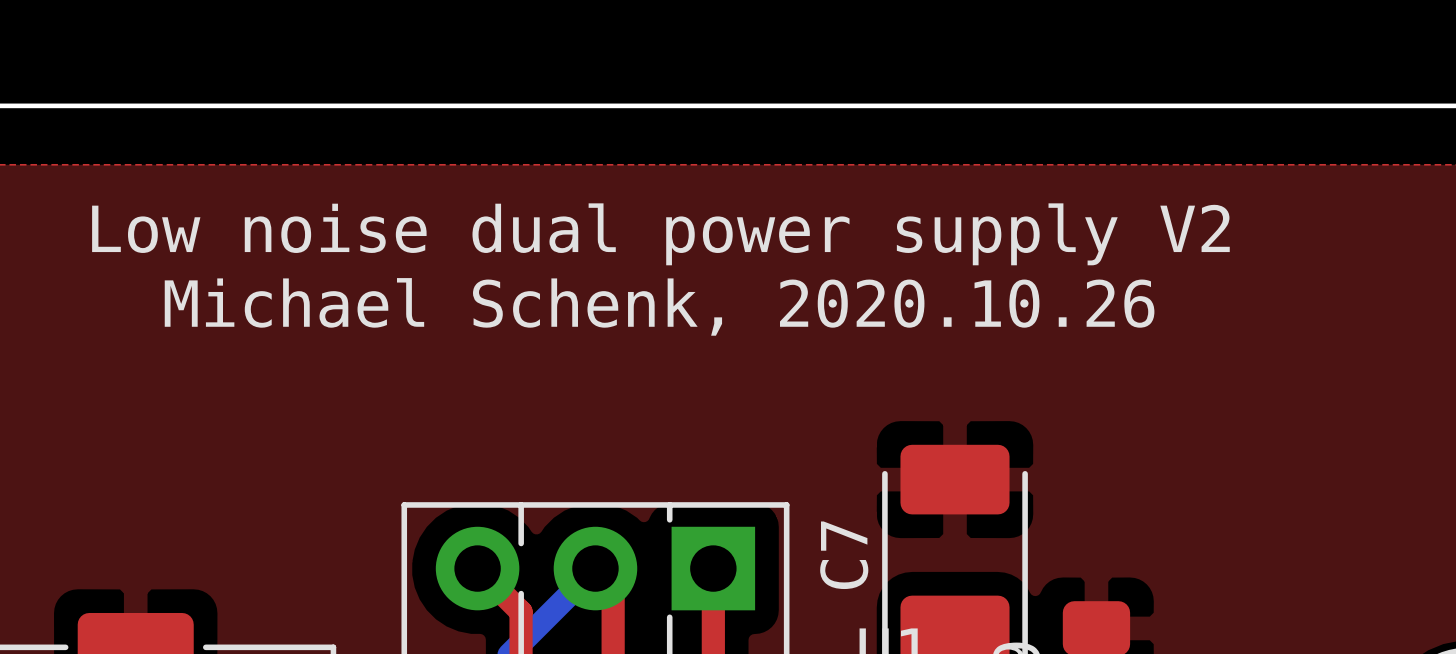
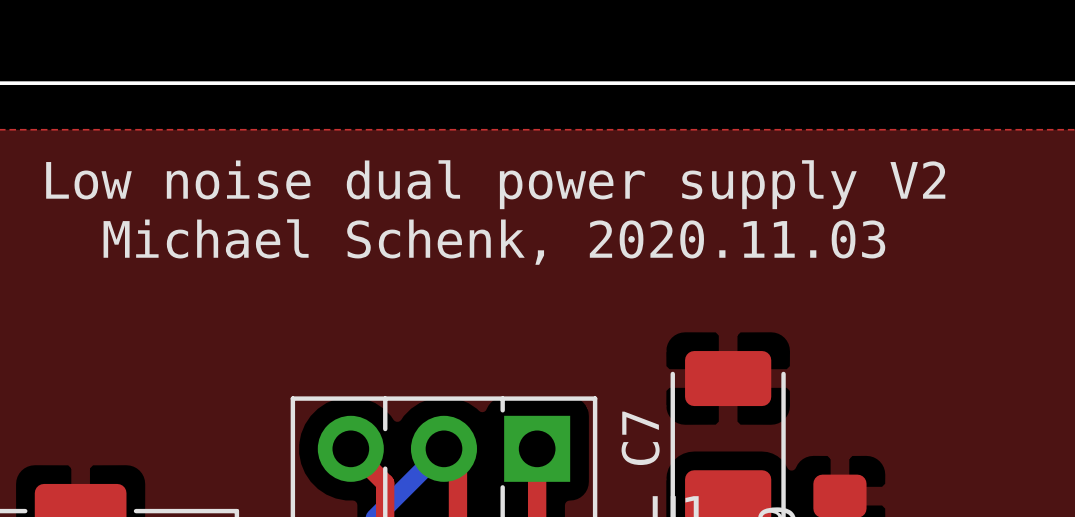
text: Michael Schenk, 2020.10.26 (659, 306) -> Michael Schenk, 2020.11.03 (494, 242)

